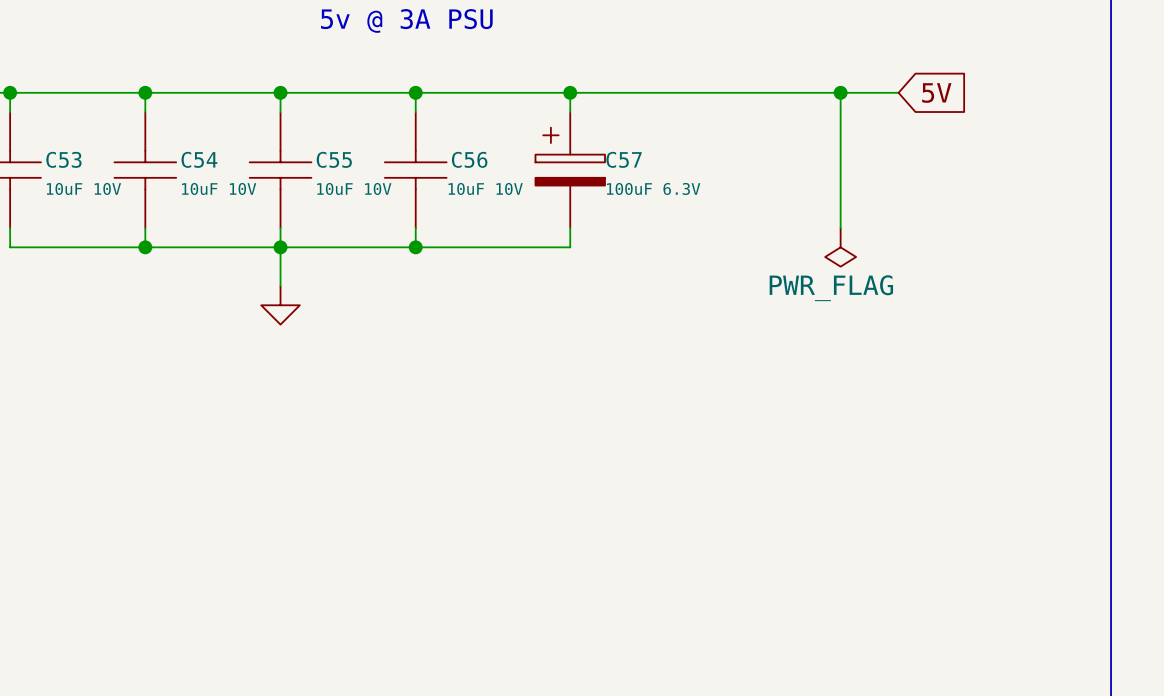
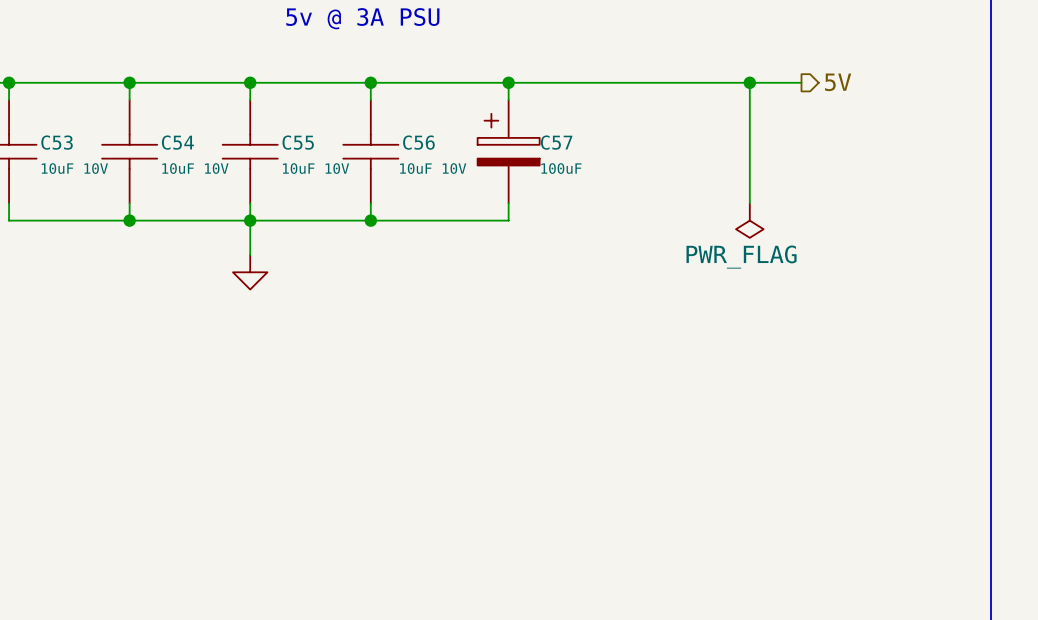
hierarchical label: none -> 5V (838, 82)
global label: 5V (936, 93) -> none
C57 value: 100uF 6.3V (653, 188) -> 100uF (561, 168)

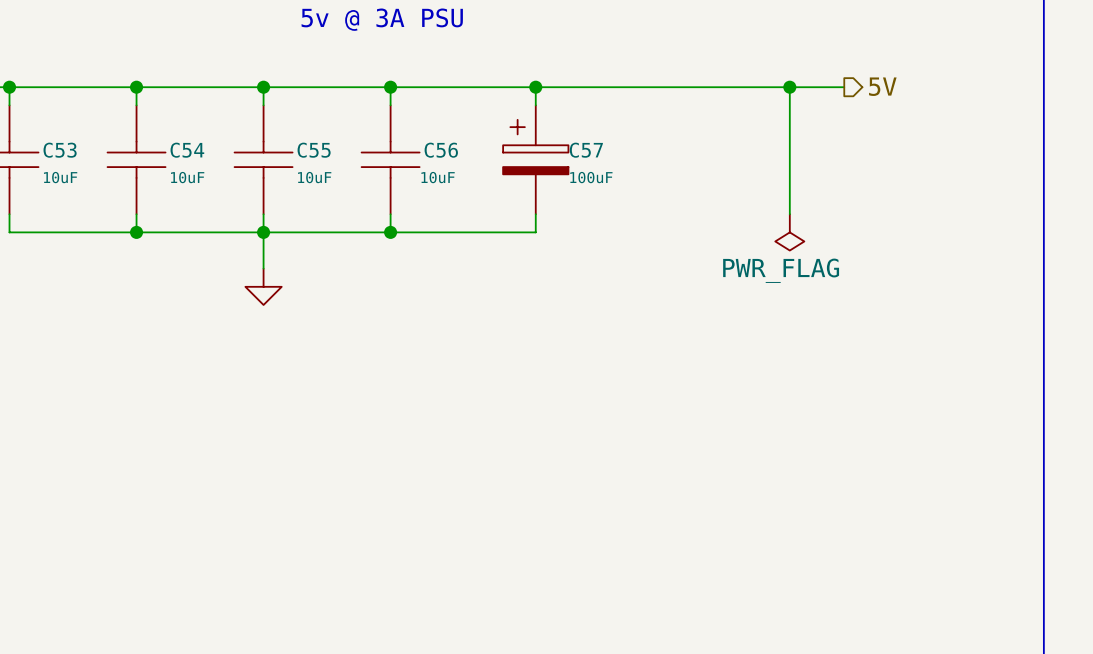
C53 value: 10uF 10V (74, 168) -> 10uF (60, 177)
C54 value: 10uF 10V (195, 168) -> 10uF (187, 177)
C55 value: 10uF 10V (316, 168) -> 10uF (314, 177)
C56 value: 10uF 10V (433, 168) -> 10uF (438, 177)

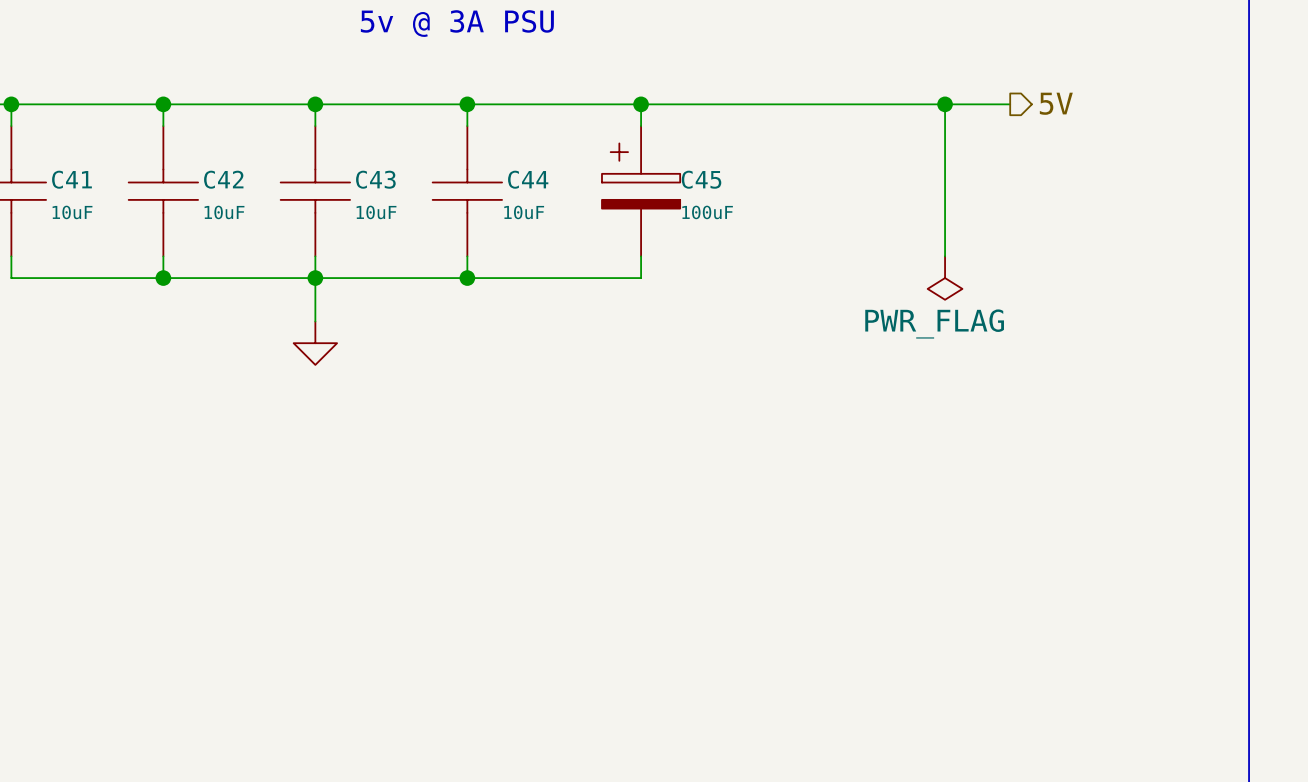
C53 name: C53 (60, 150) -> C41 (71, 179)
C54 name: C54 (187, 150) -> C42 (223, 179)
C55 name: C55 (314, 150) -> C43 (375, 179)
C56 name: C56 (441, 150) -> C44 (528, 179)
C57 name: C57 (586, 150) -> C45 (701, 179)

